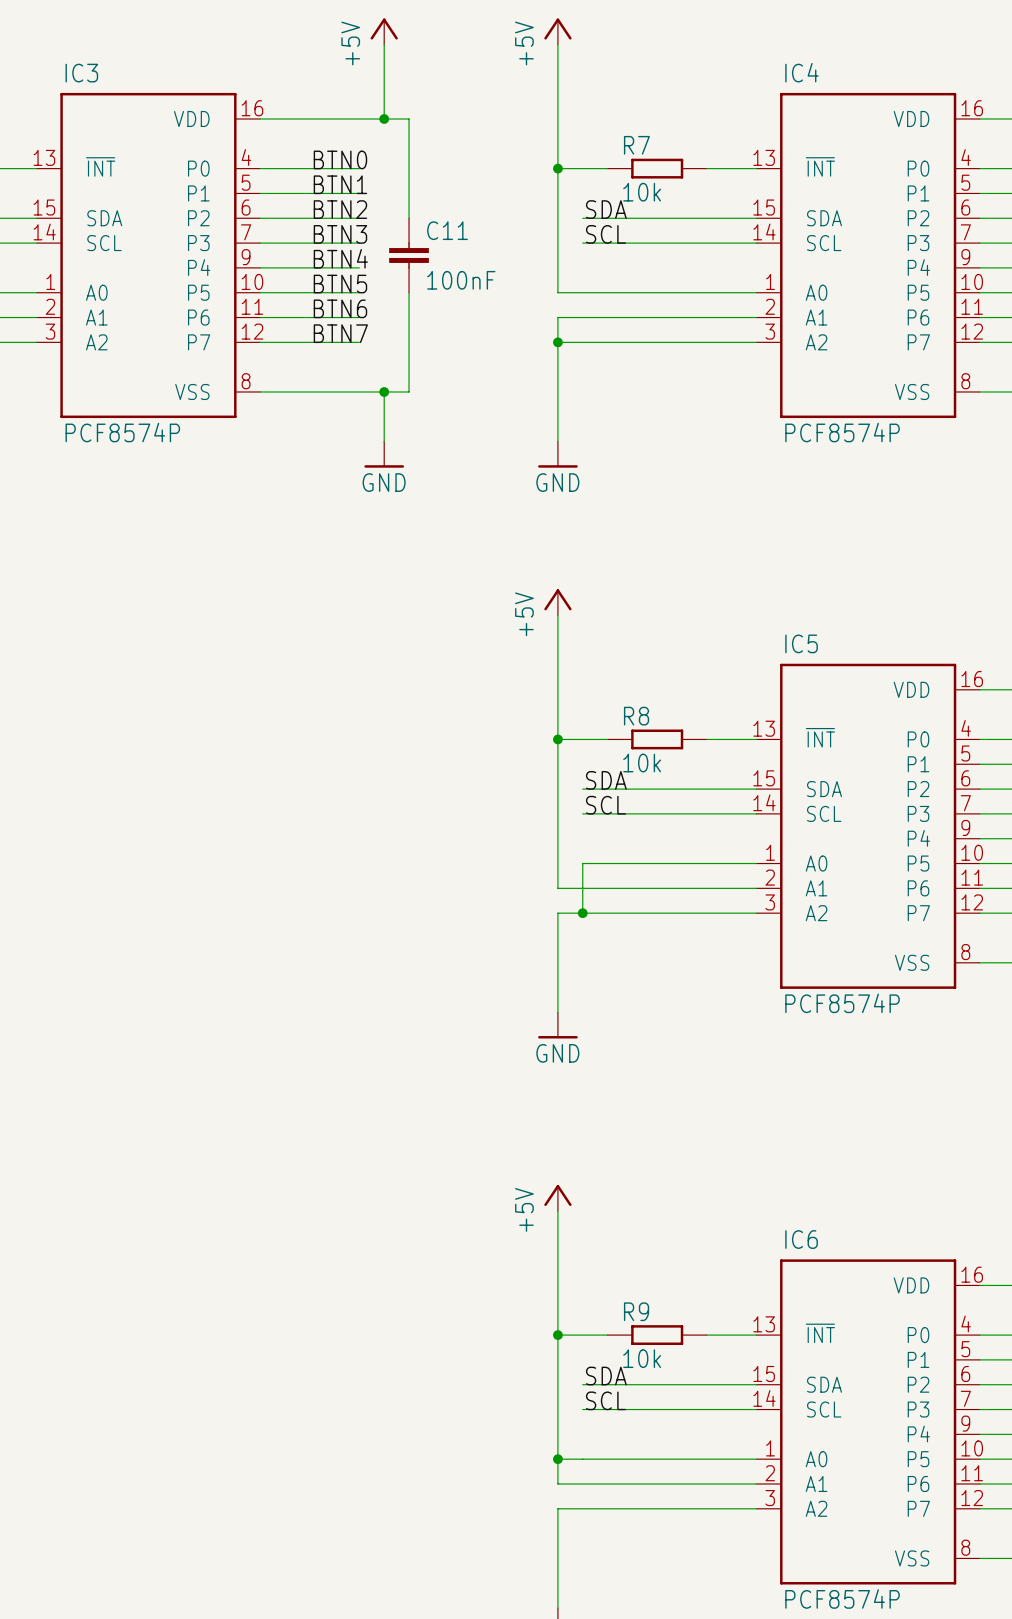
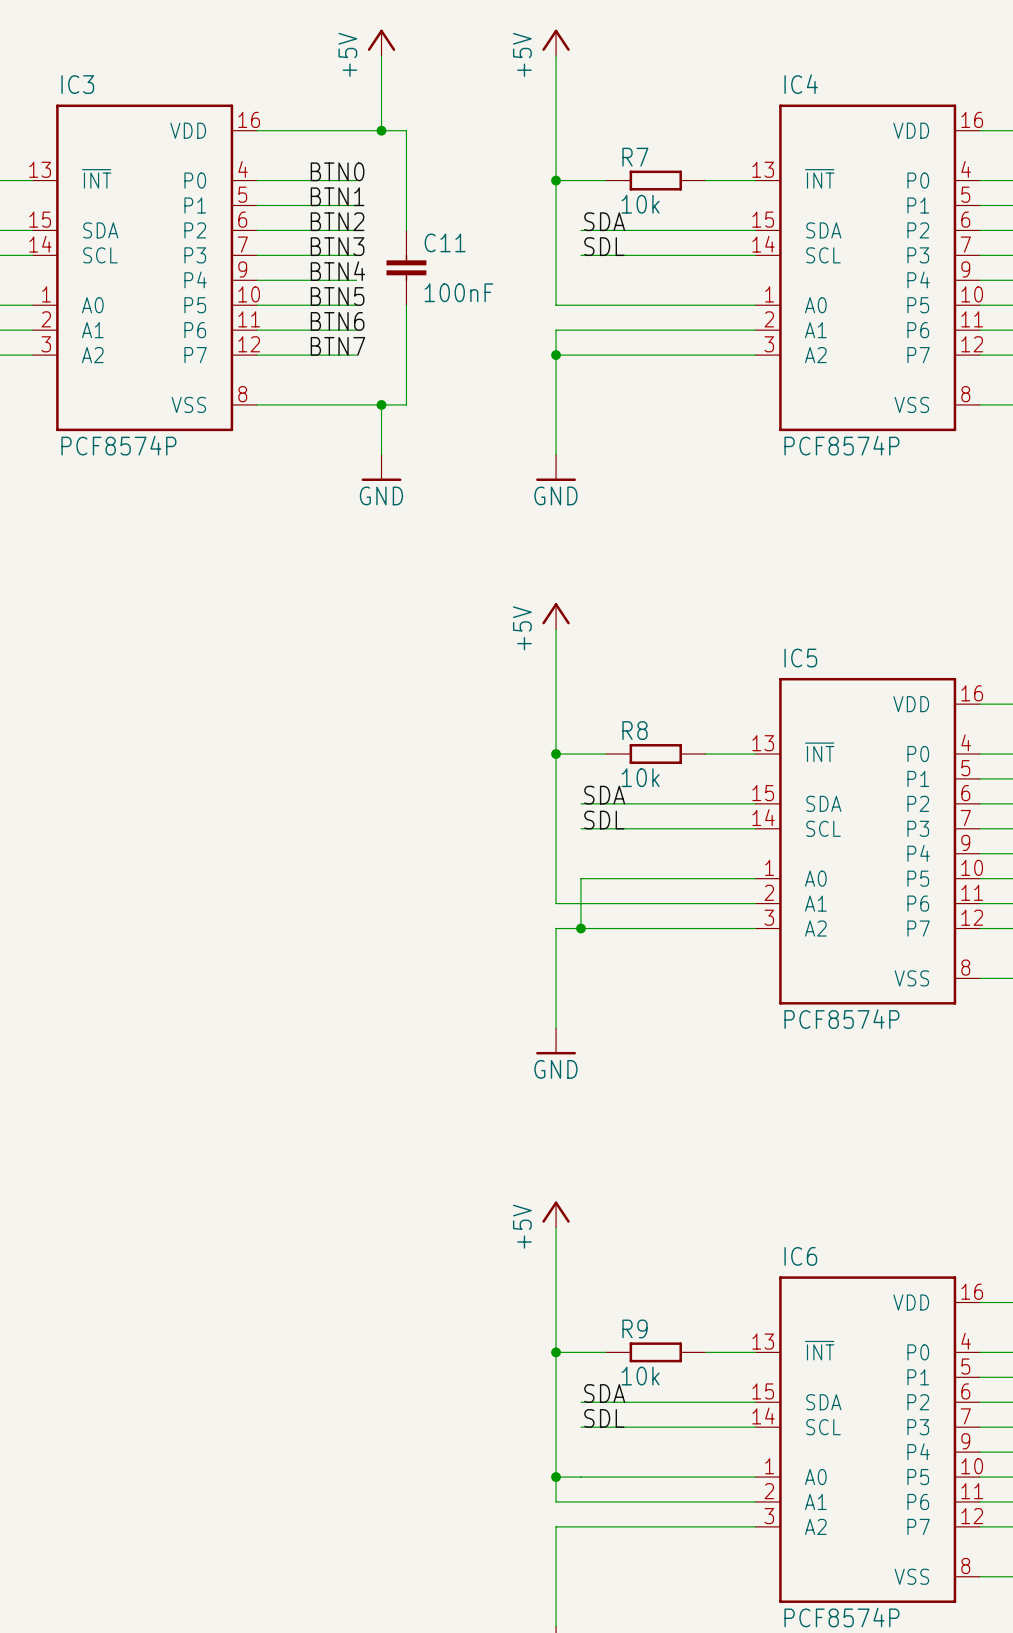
label: SCL (606, 234) -> SDL (604, 246)
label: SCL (606, 805) -> SDL (604, 820)
label: SCL (606, 1400) -> SDL (604, 1418)

